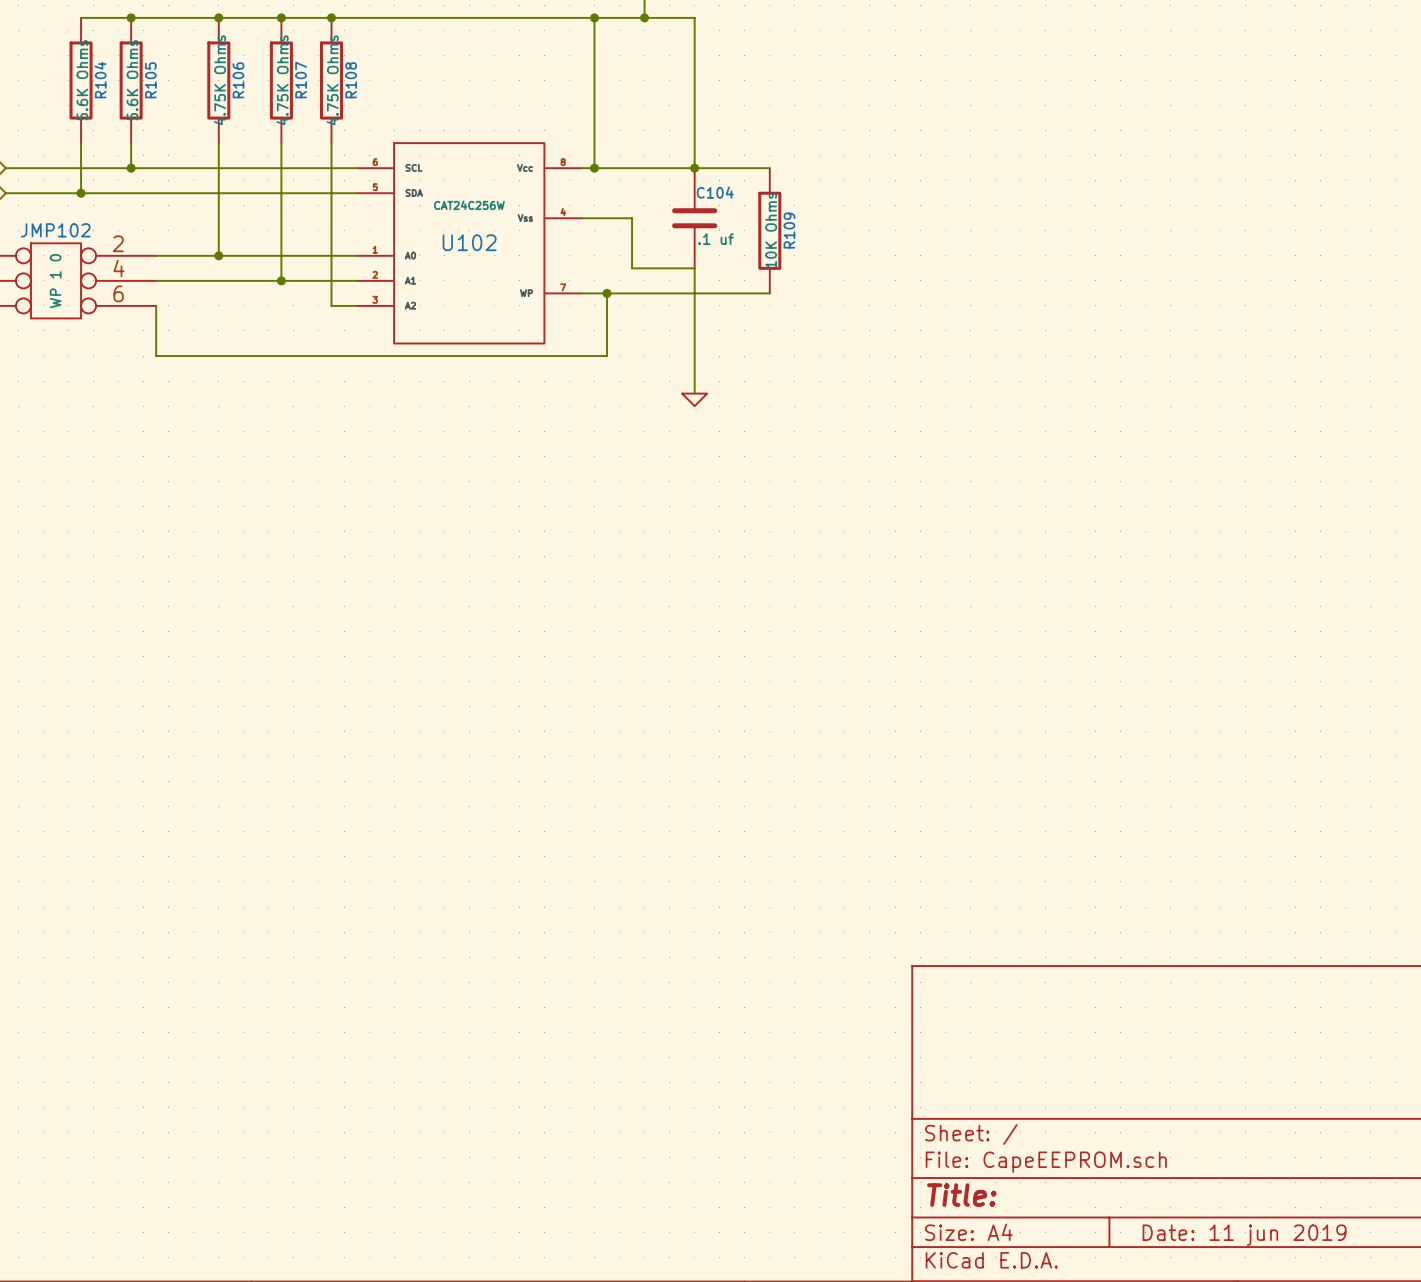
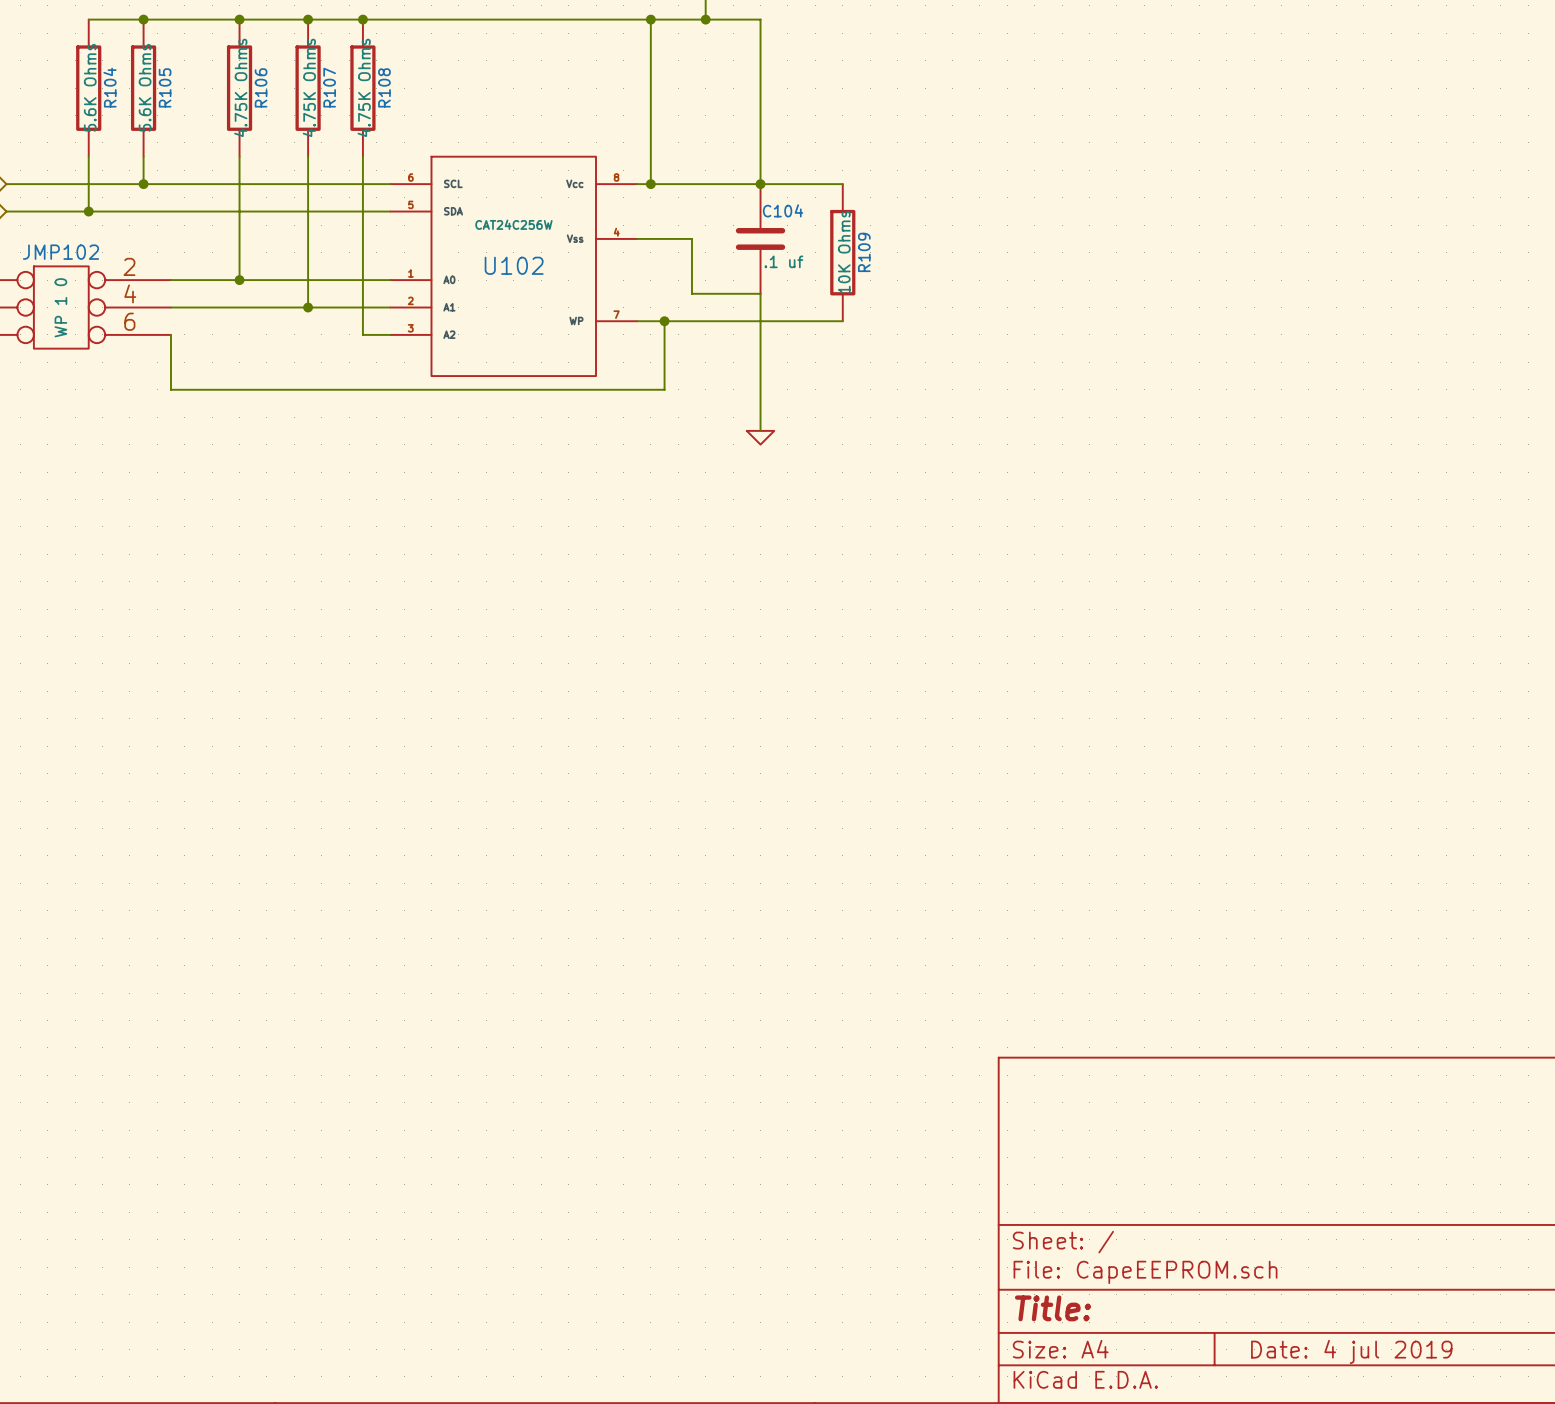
title block: Date: 11 jun 2019 (1244, 1235) -> Date: 4 jul 2019 (1351, 1351)

